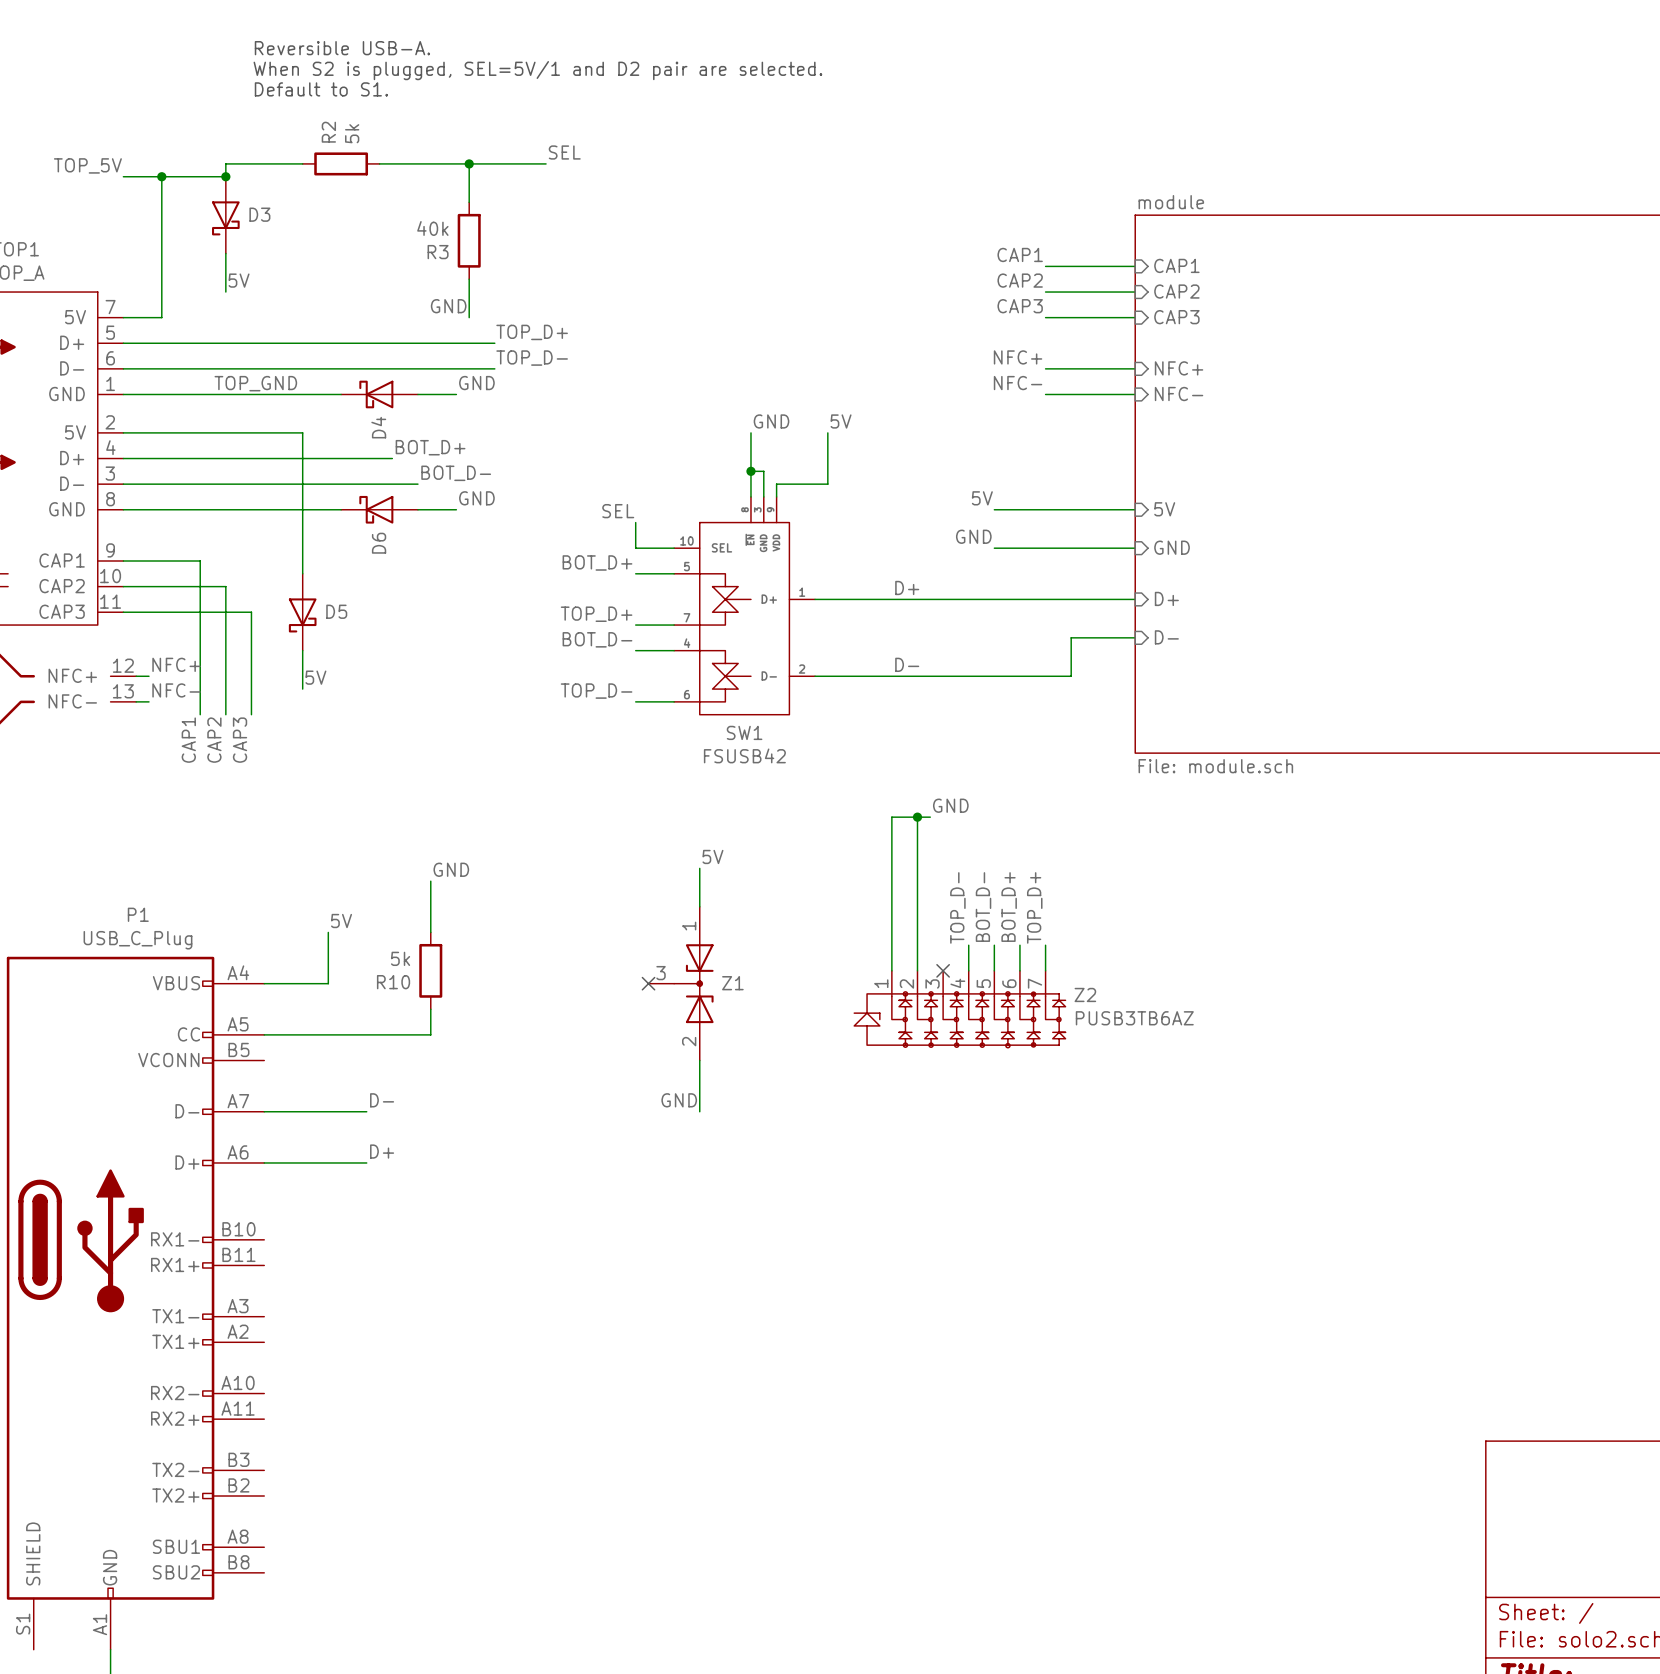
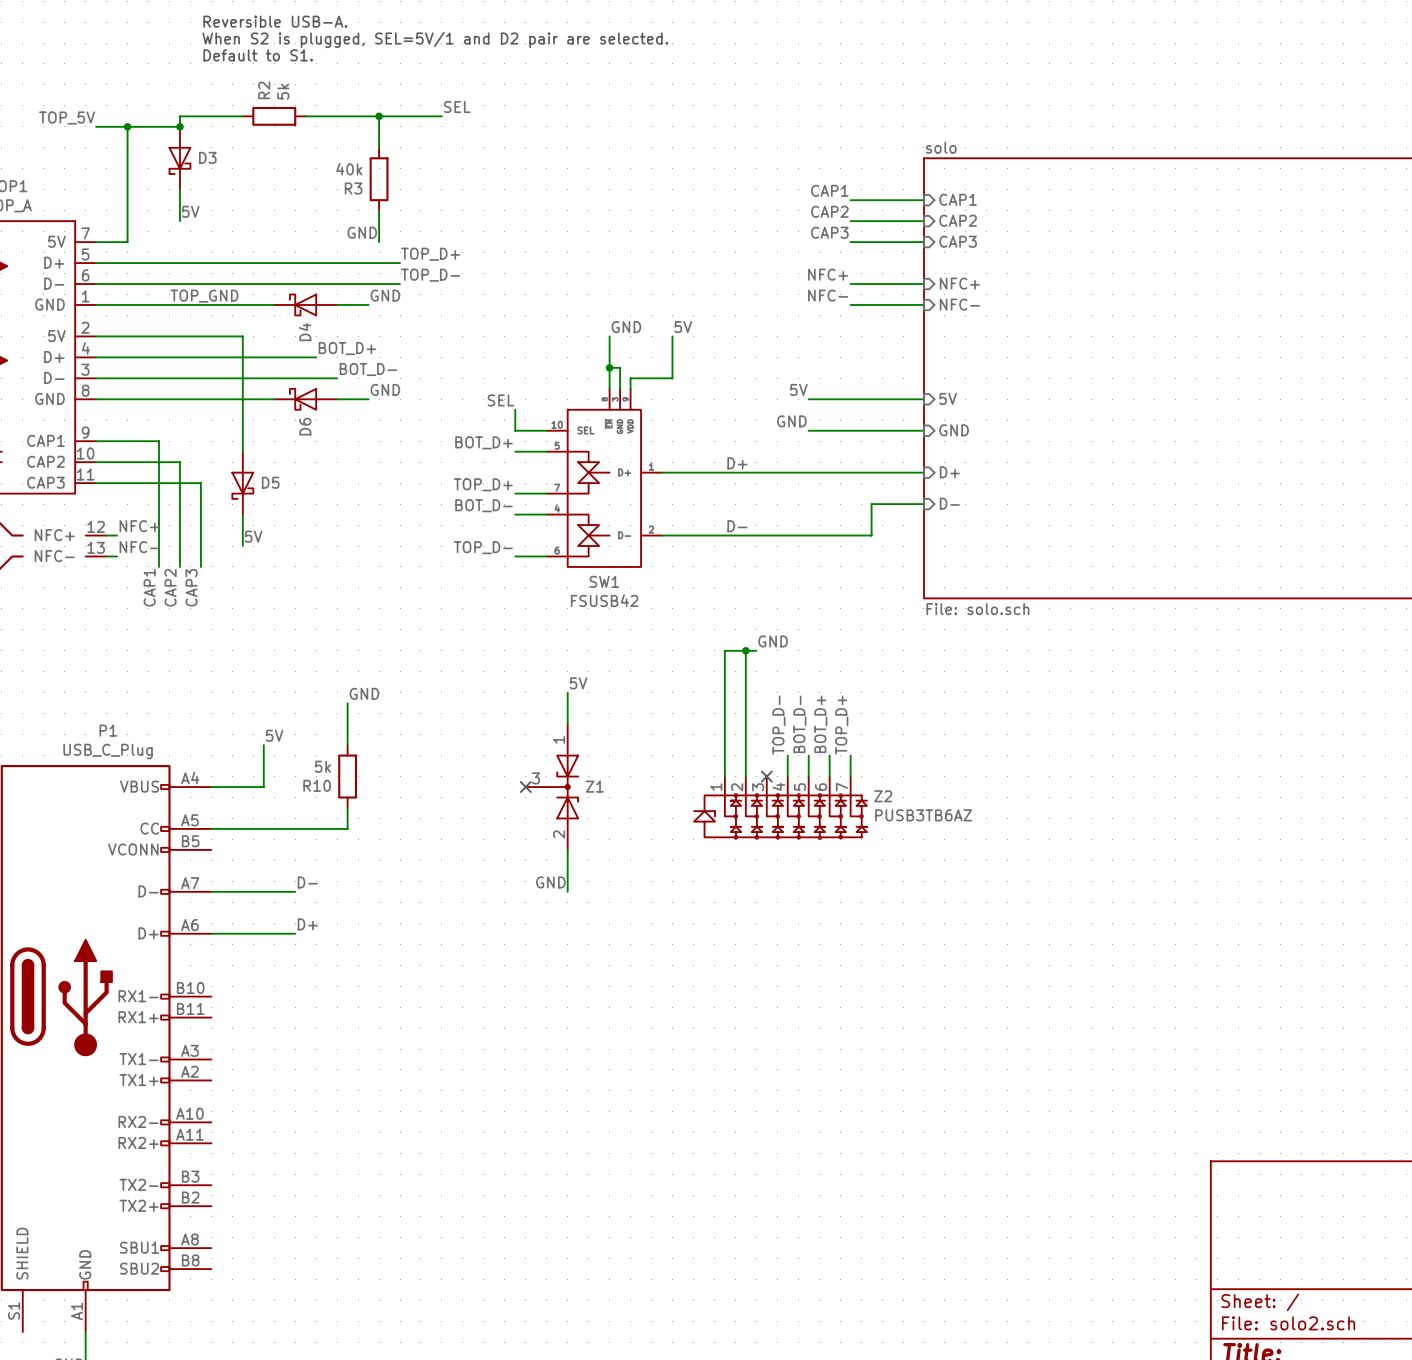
sheet module name: module (1171, 202) -> solo (941, 147)
sheet module value: File: module.sch (1215, 766) -> File: solo.sch (977, 609)

